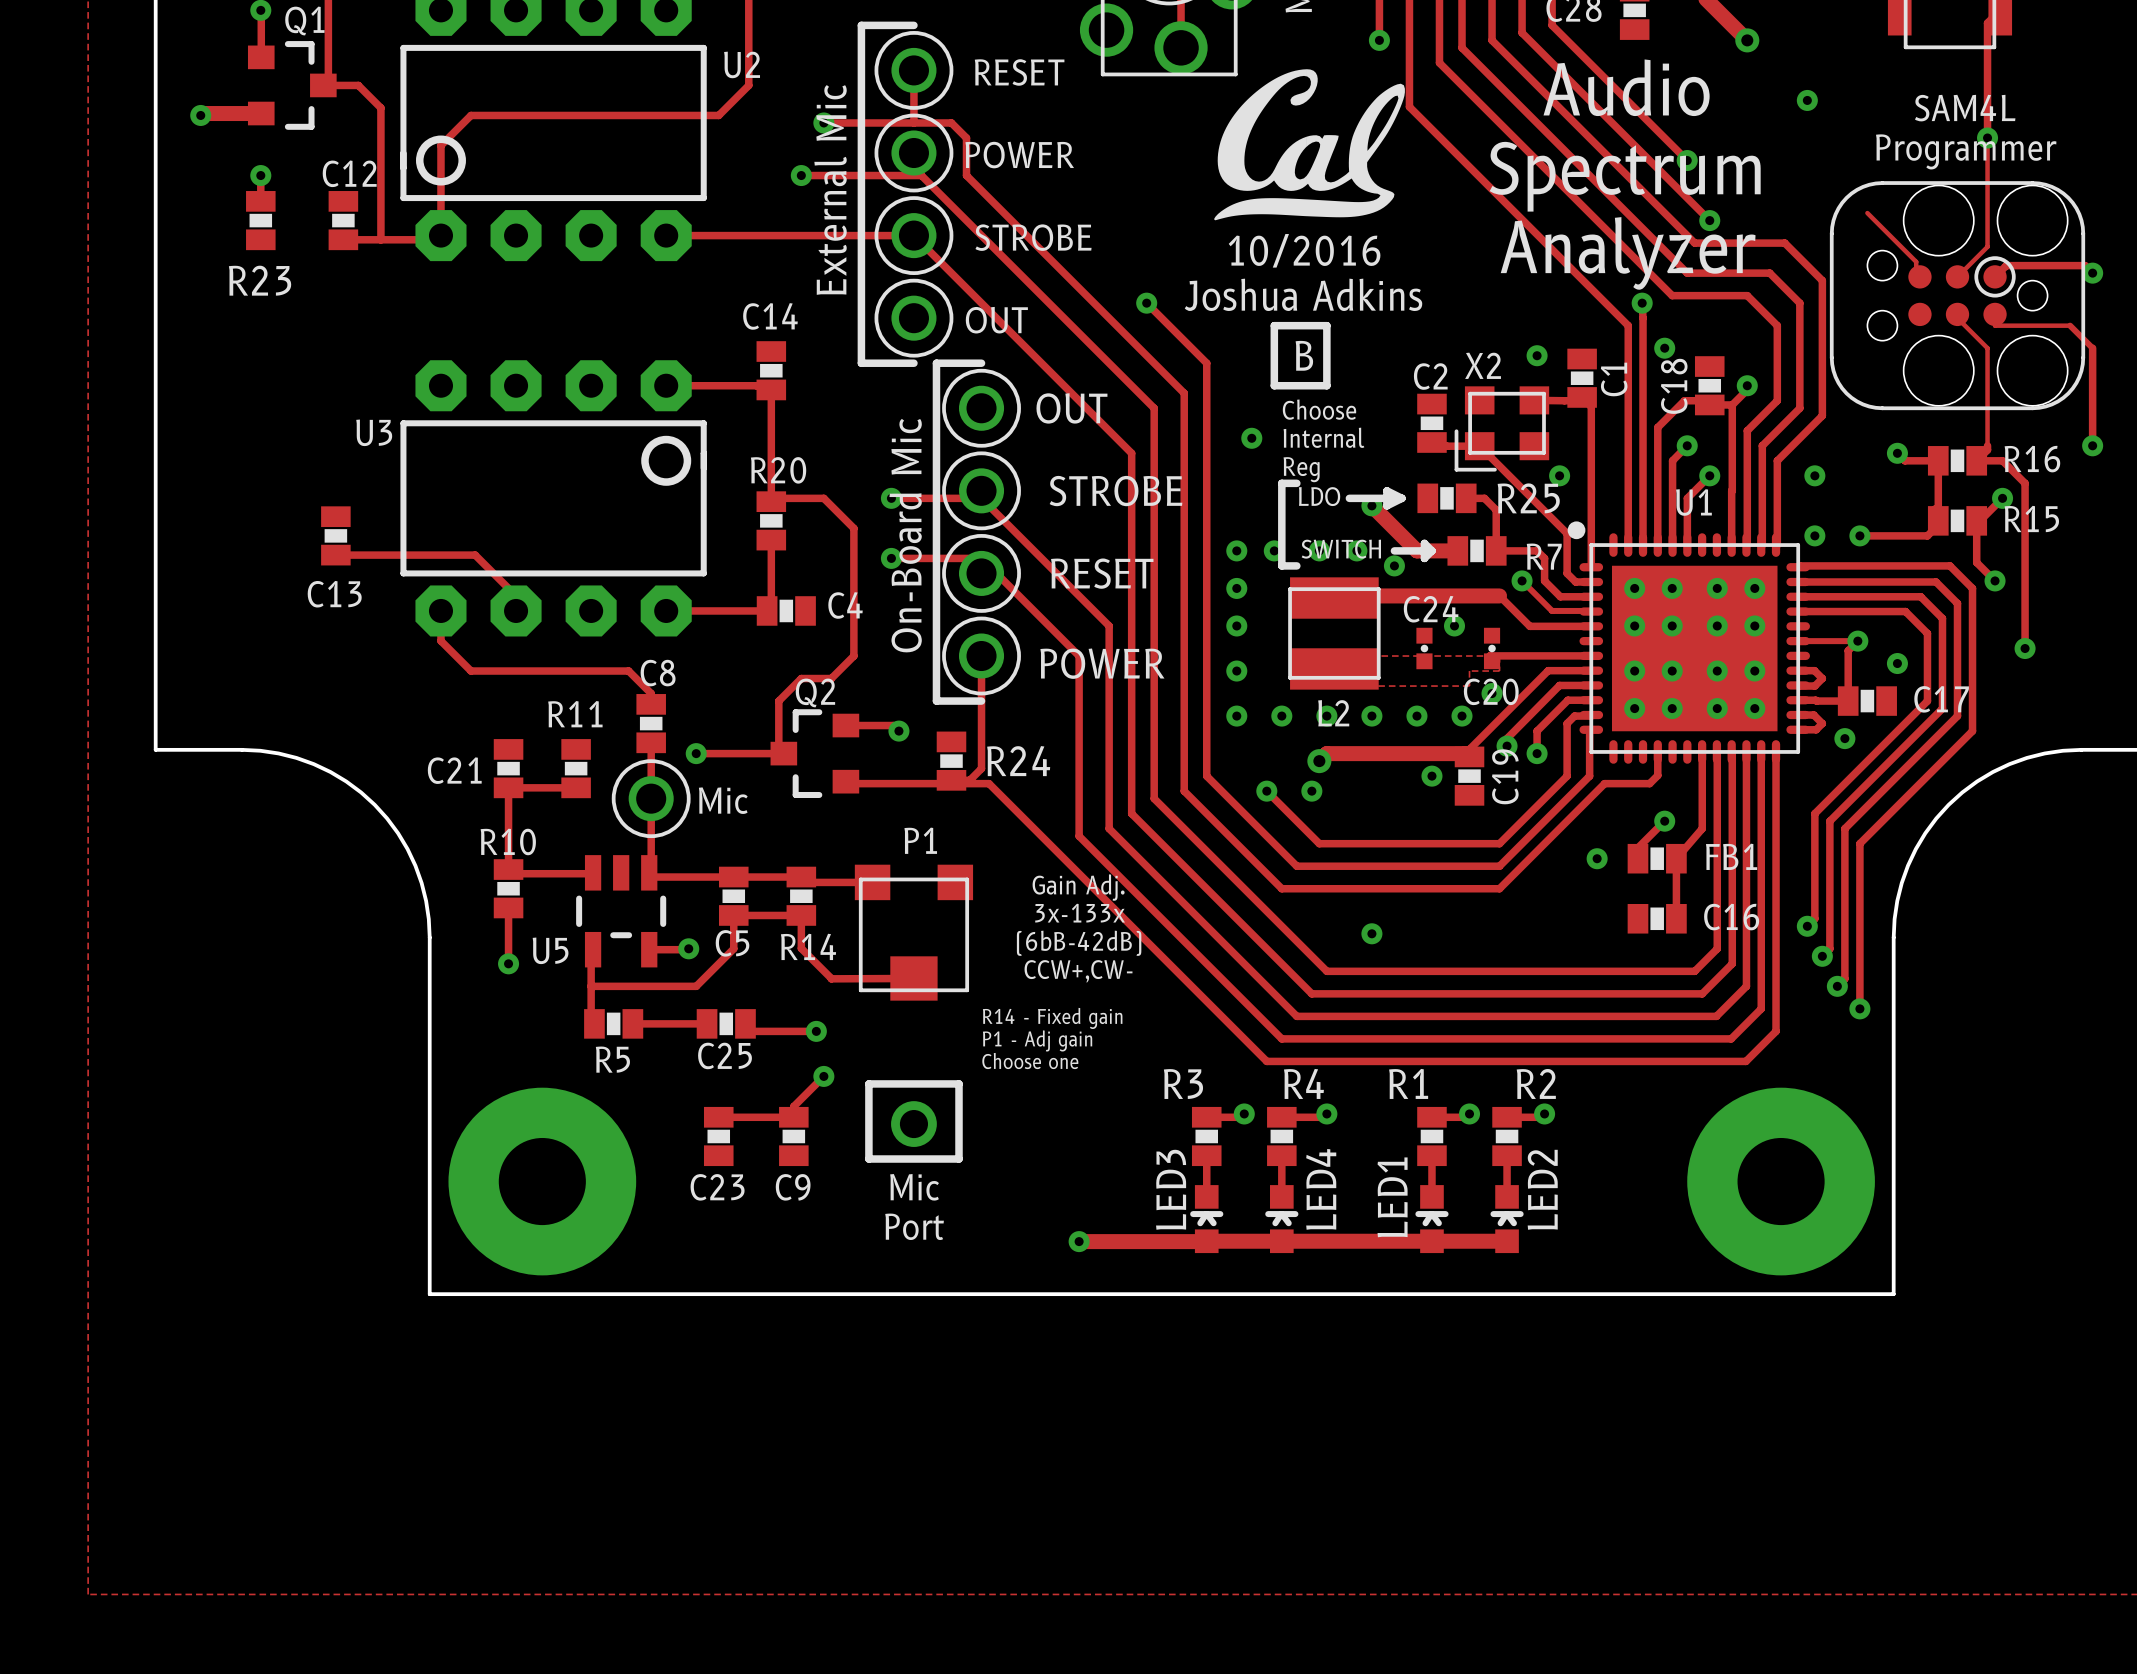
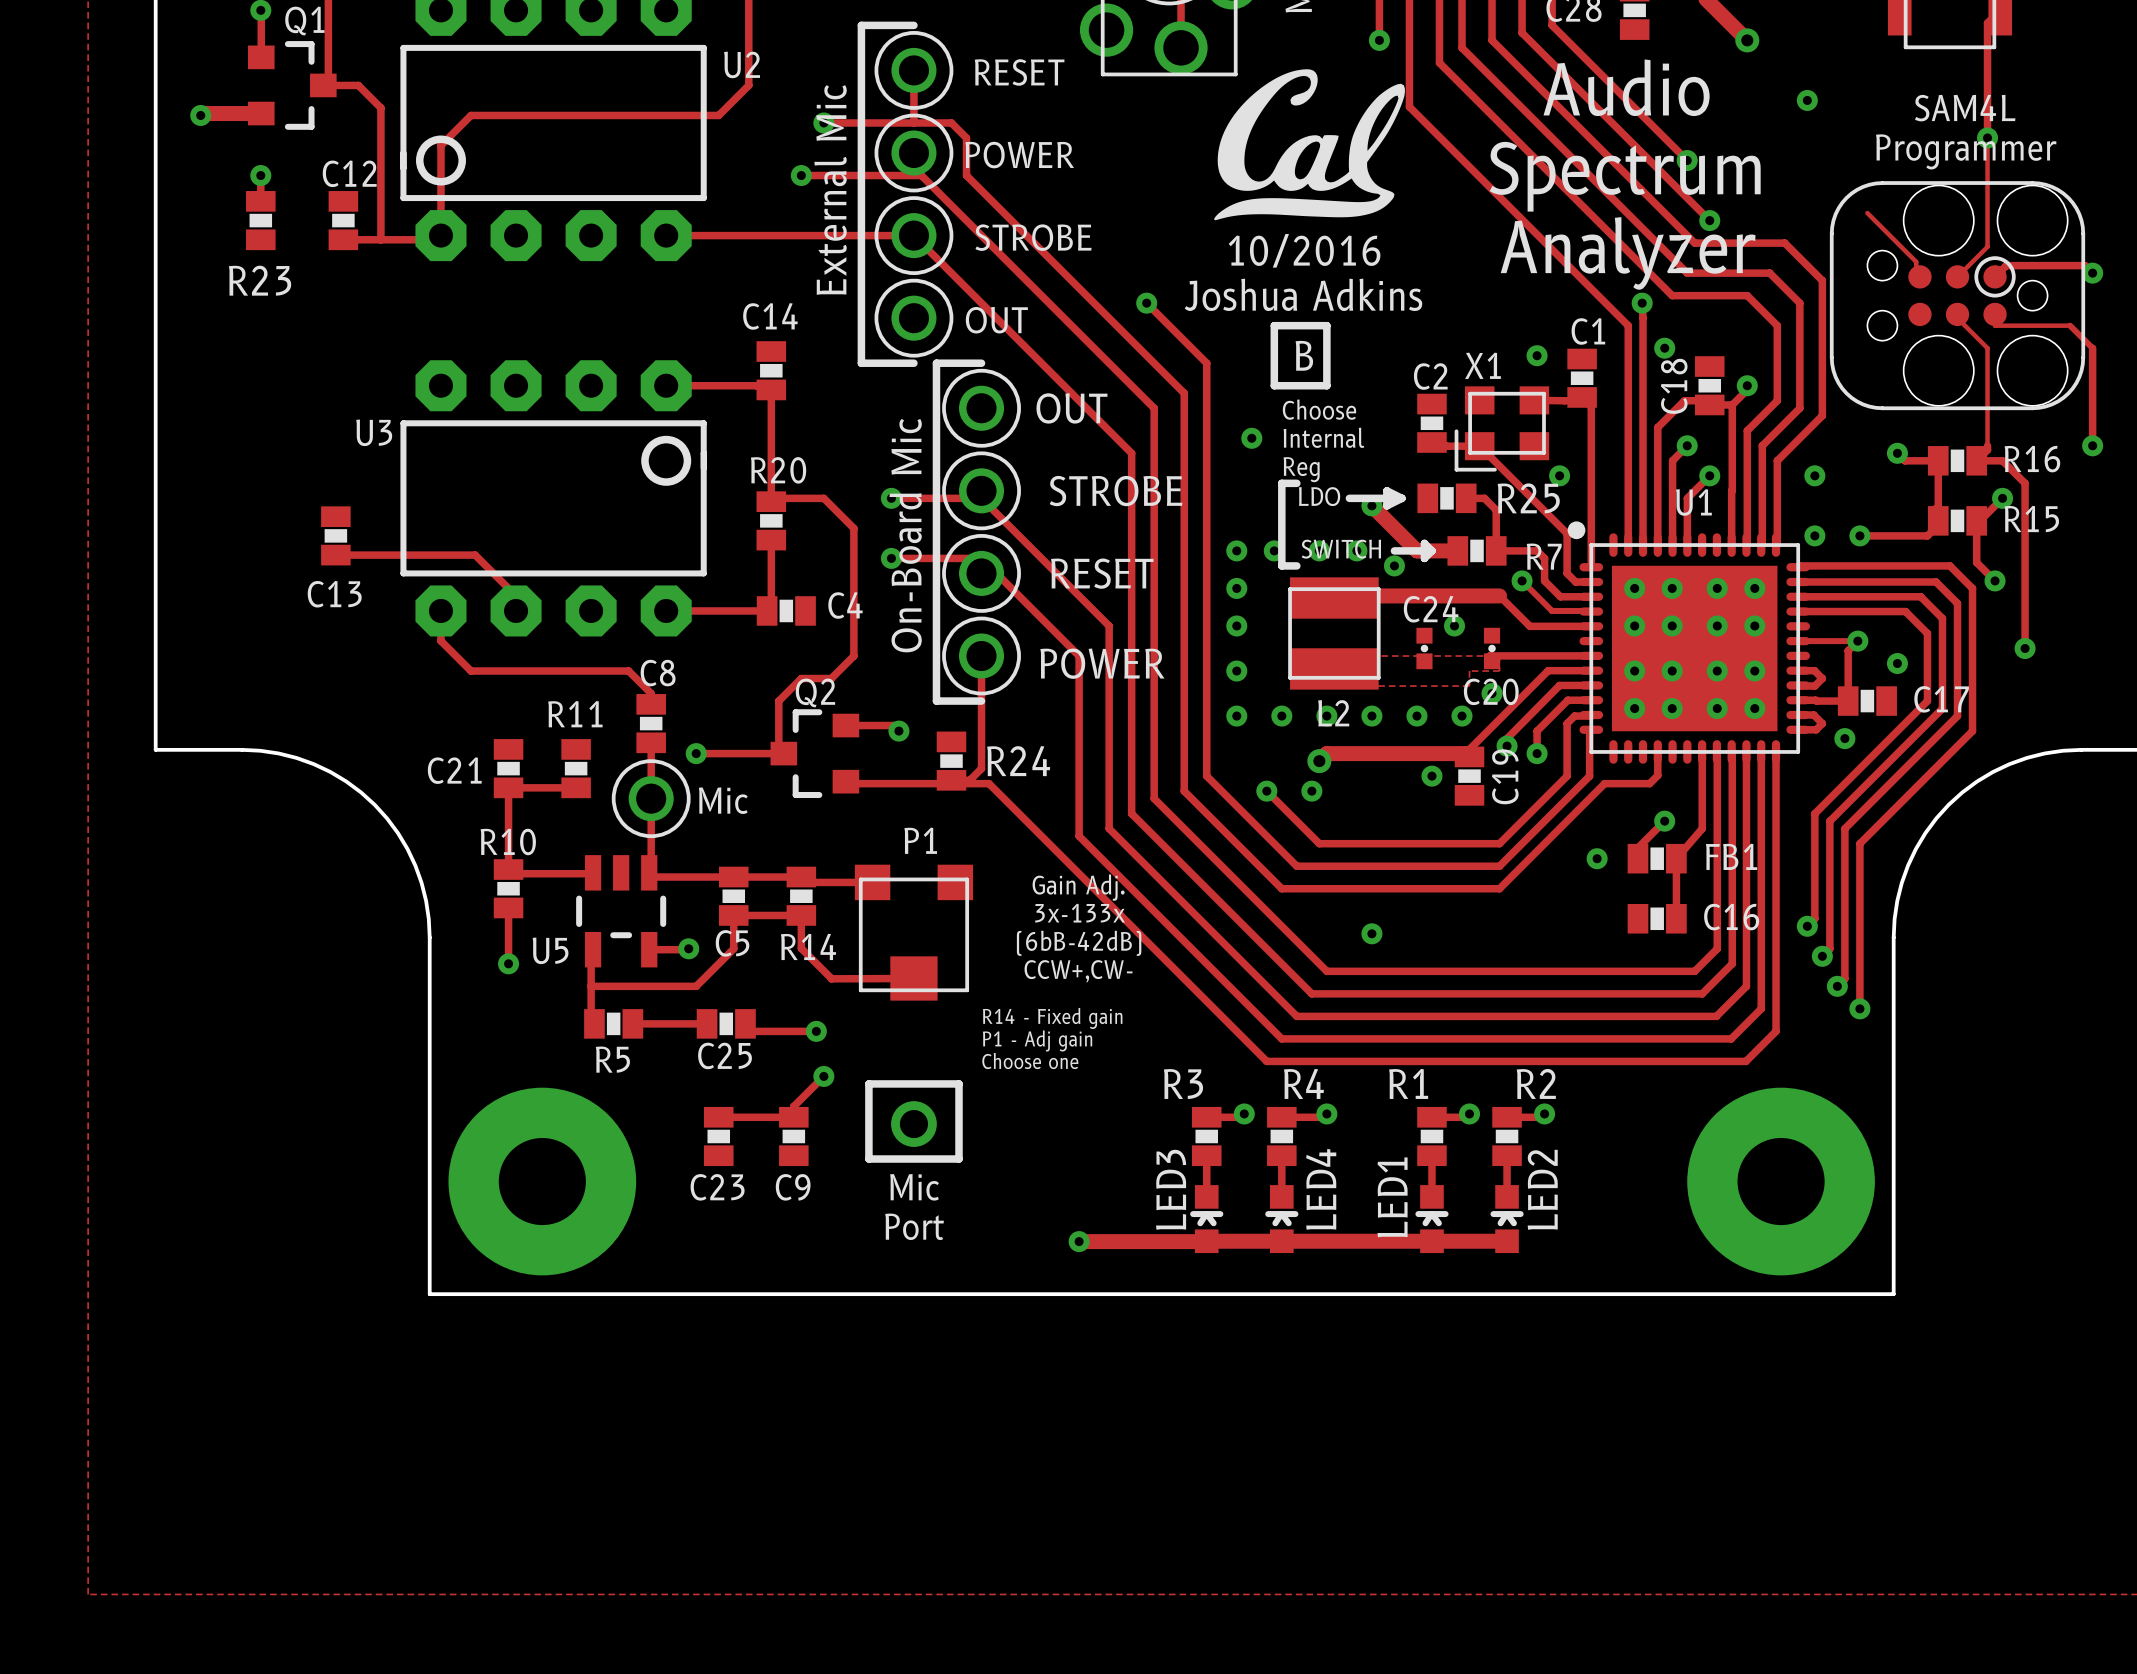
X2 name: X2 (1483, 365) -> X1 (1482, 365)
C1 name rotation: 0° (1614, 379) -> 90° clockwise (1588, 331)

